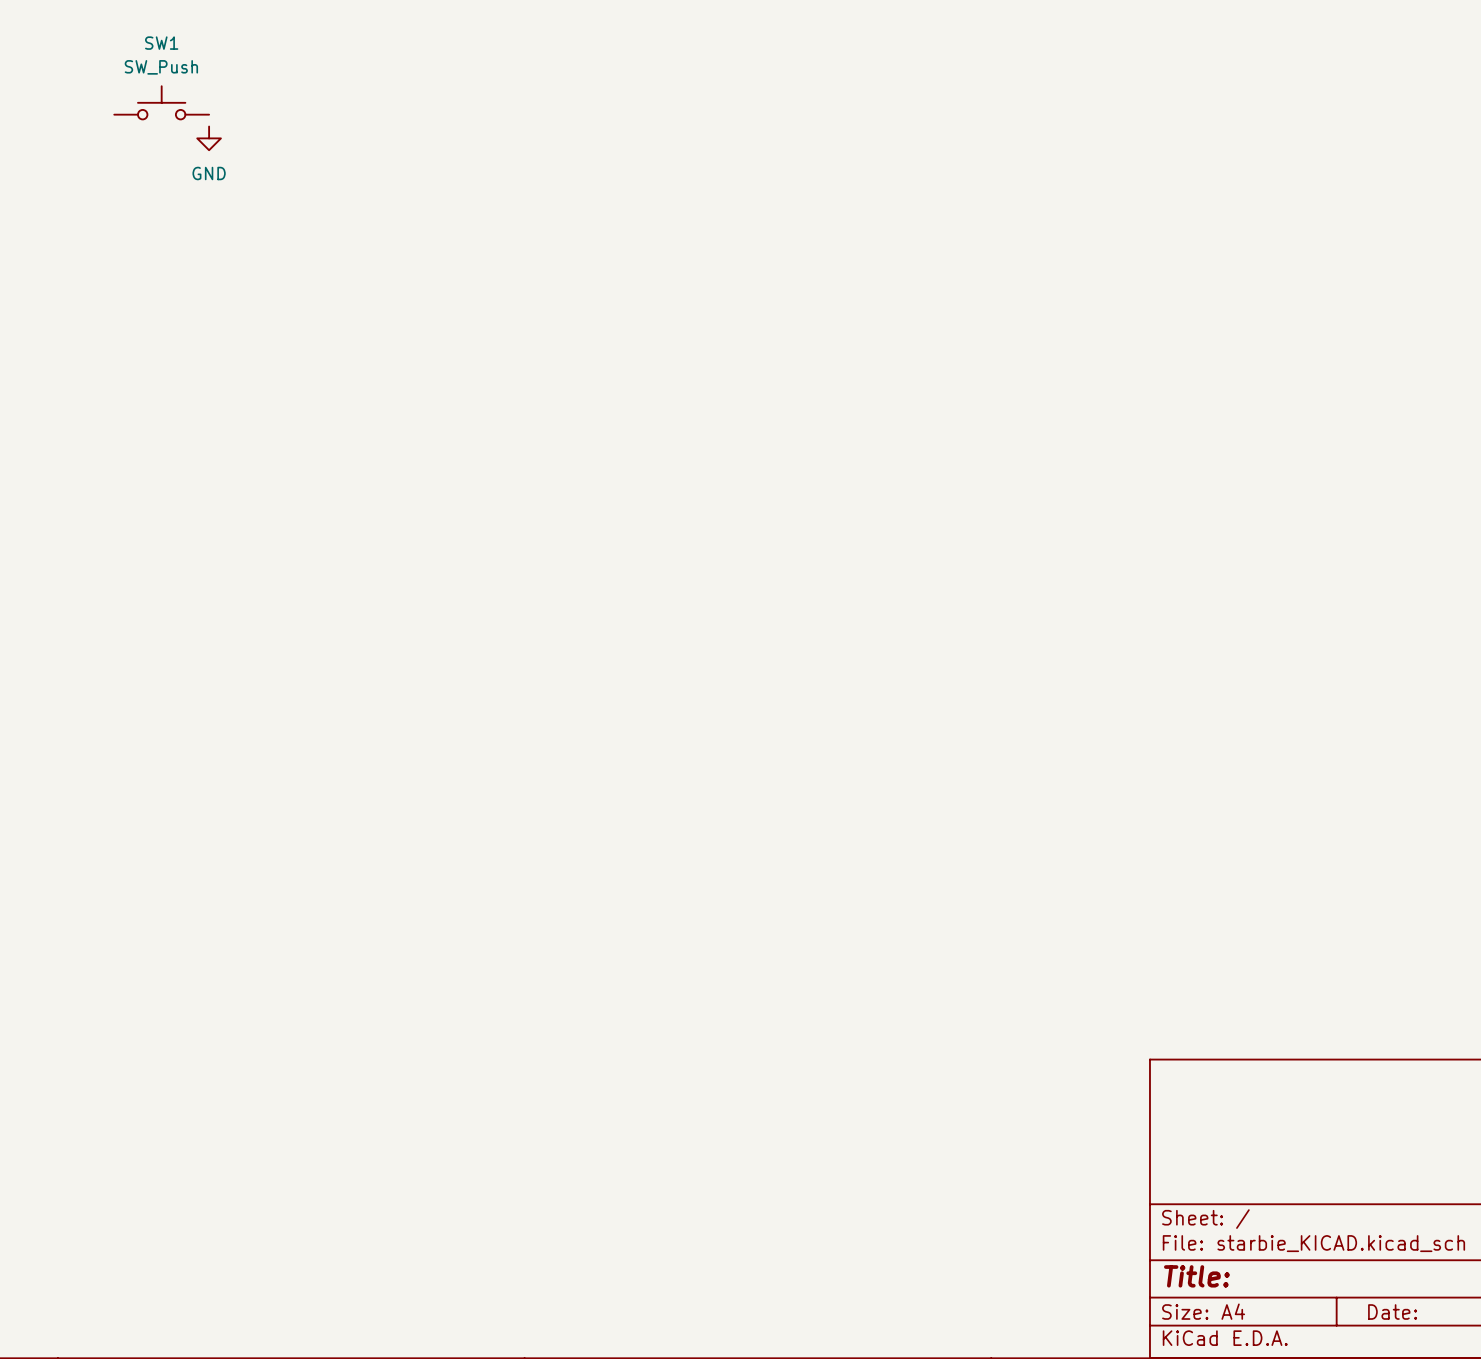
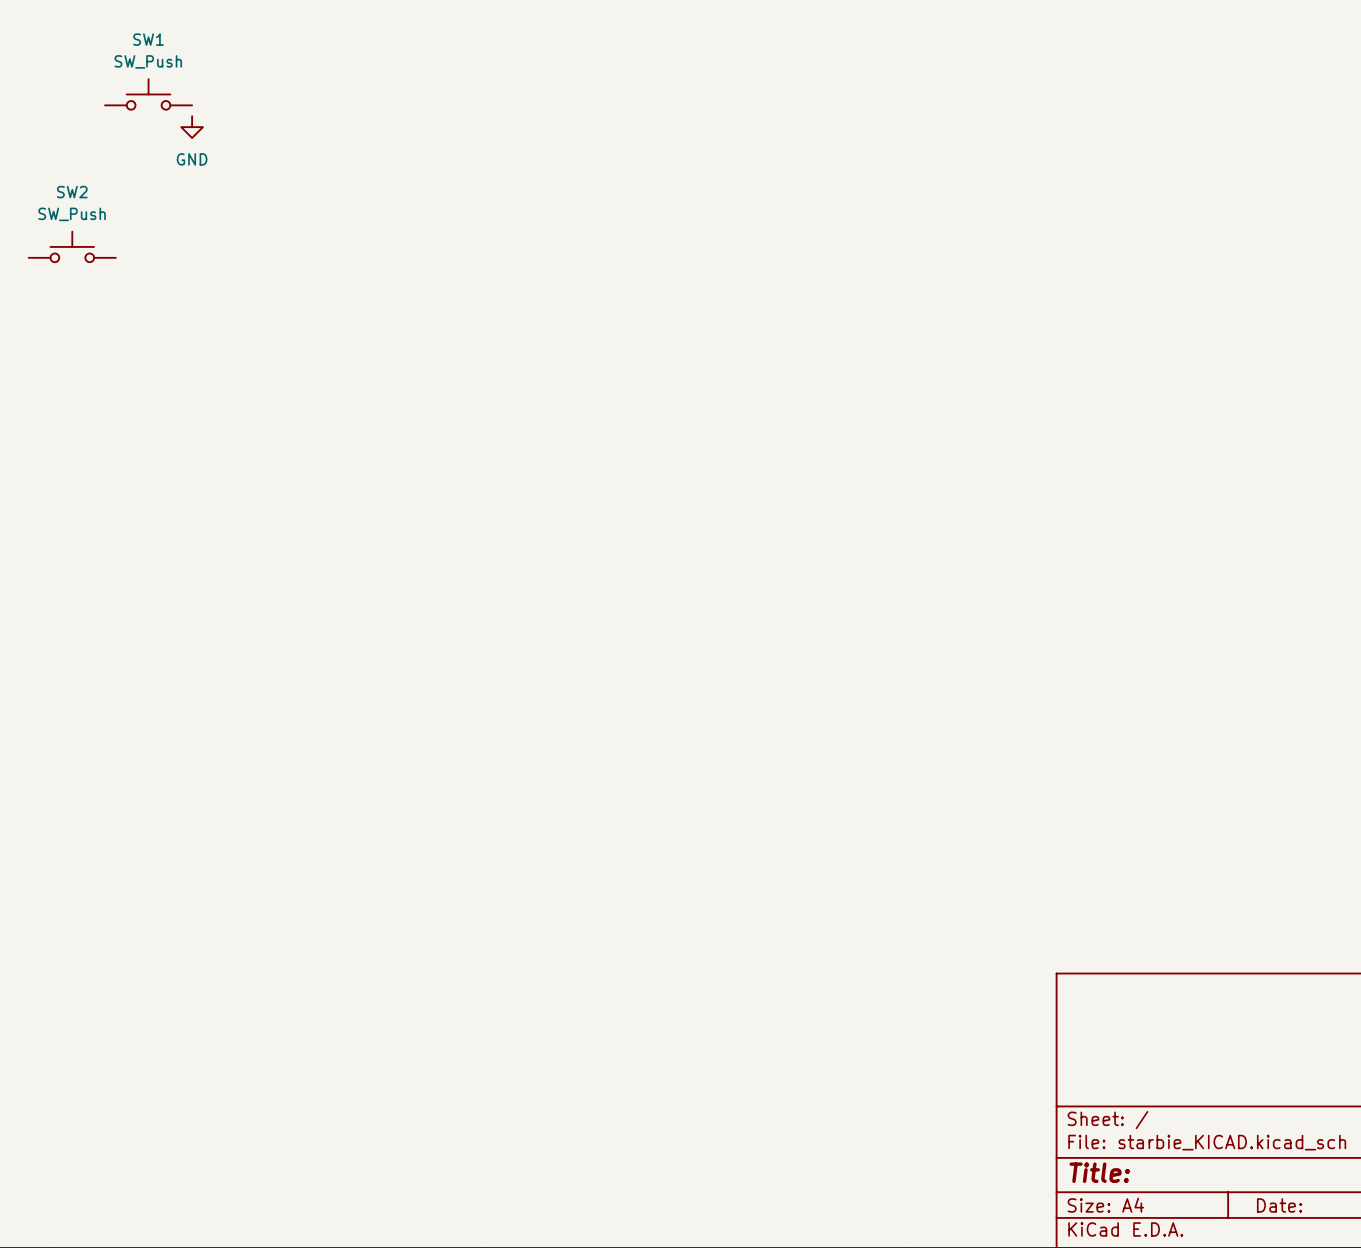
SW2: none -> SW_Push (72, 246)

